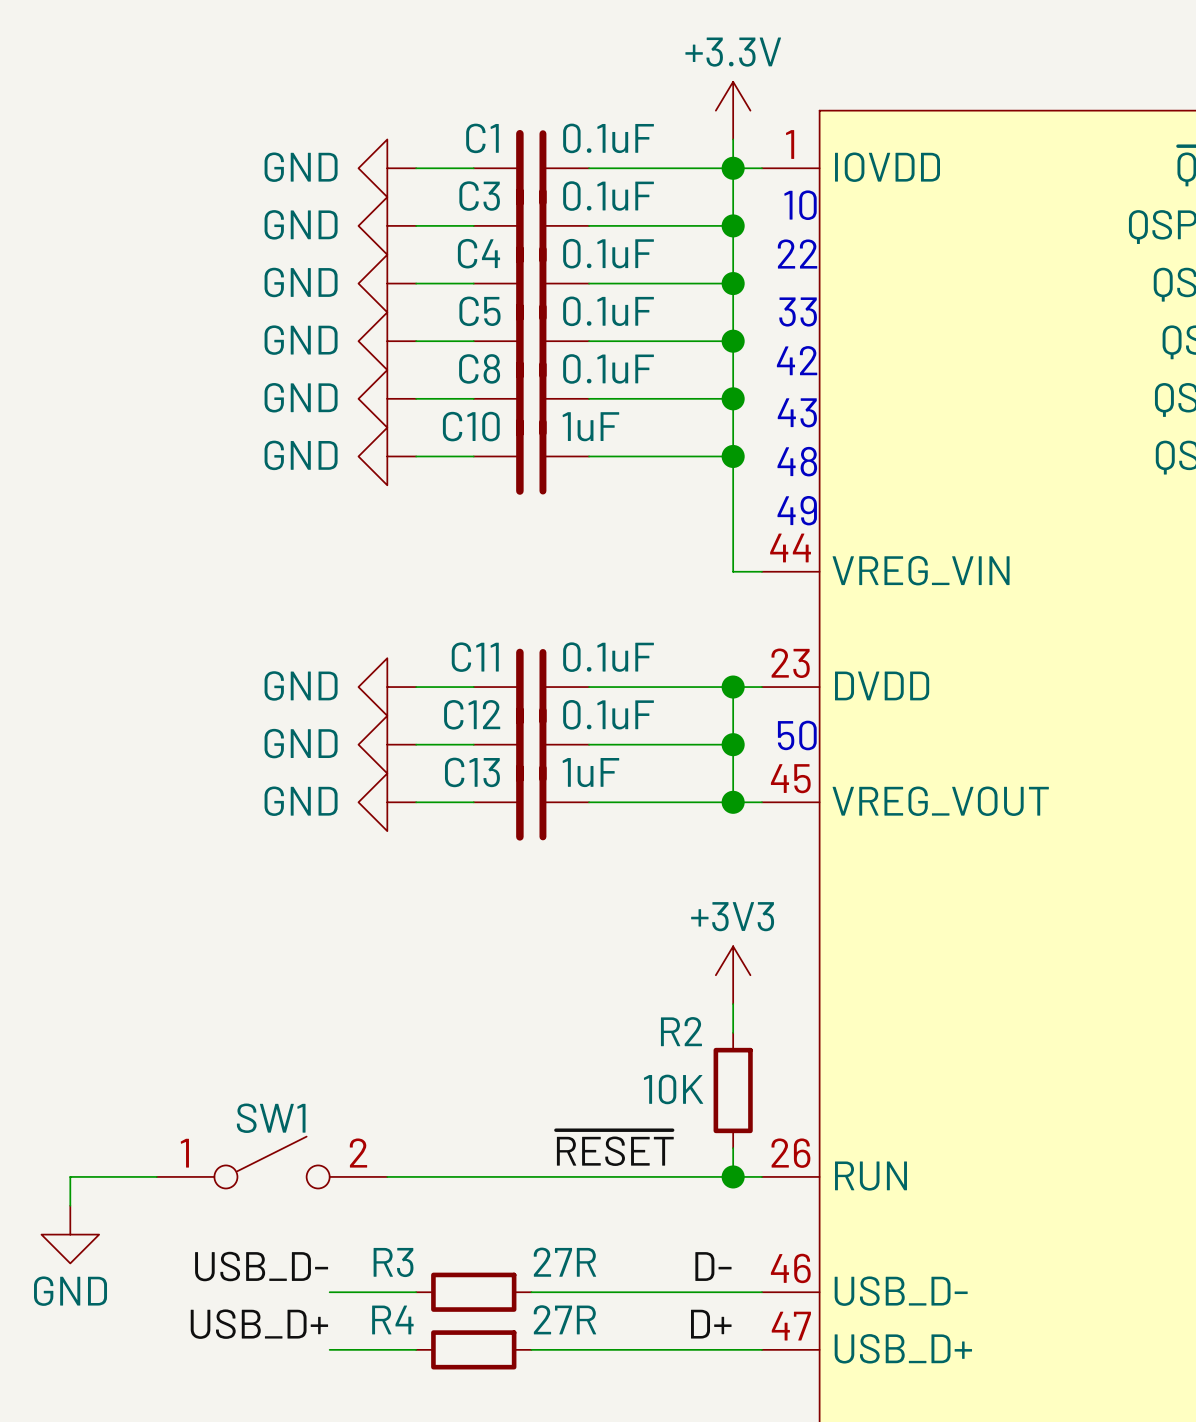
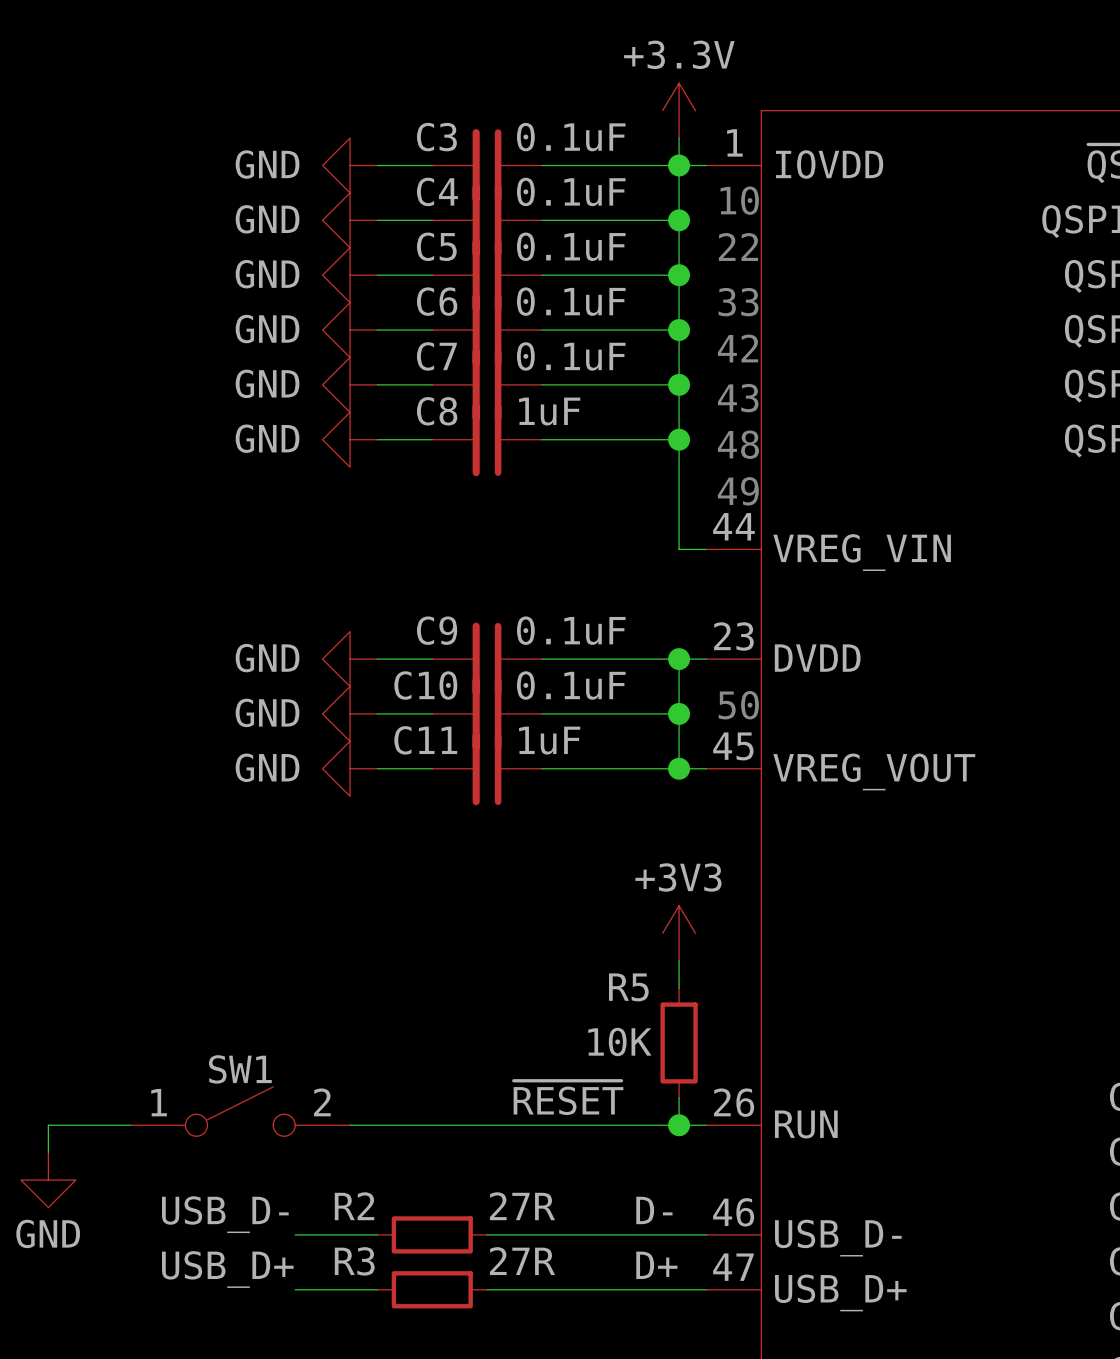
C1 name: C1 (482, 138) -> C3 (436, 137)
C3 name: C3 (479, 196) -> C4 (437, 191)
C4 name: C4 (478, 253) -> C5 (436, 246)
C5 name: C5 (479, 311) -> C6 (437, 301)
C8 name: C8 (479, 368) -> C7 (436, 356)
C10 name: C10 (471, 426) -> C8 (437, 411)
C11 name: C11 (475, 657) -> C9 (437, 630)
C12 name: C12 (472, 714) -> C10 (425, 685)
C13 name: C13 (472, 772) -> C11 (425, 740)
R2 name: R2 (681, 1031) -> R5 (628, 987)
R3 name: R3 (393, 1262) -> R2 (354, 1206)
R4 name: R4 (392, 1319) -> R3 (354, 1261)

